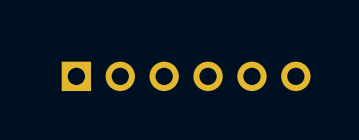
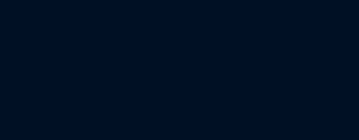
part: (186, 76) -> none

